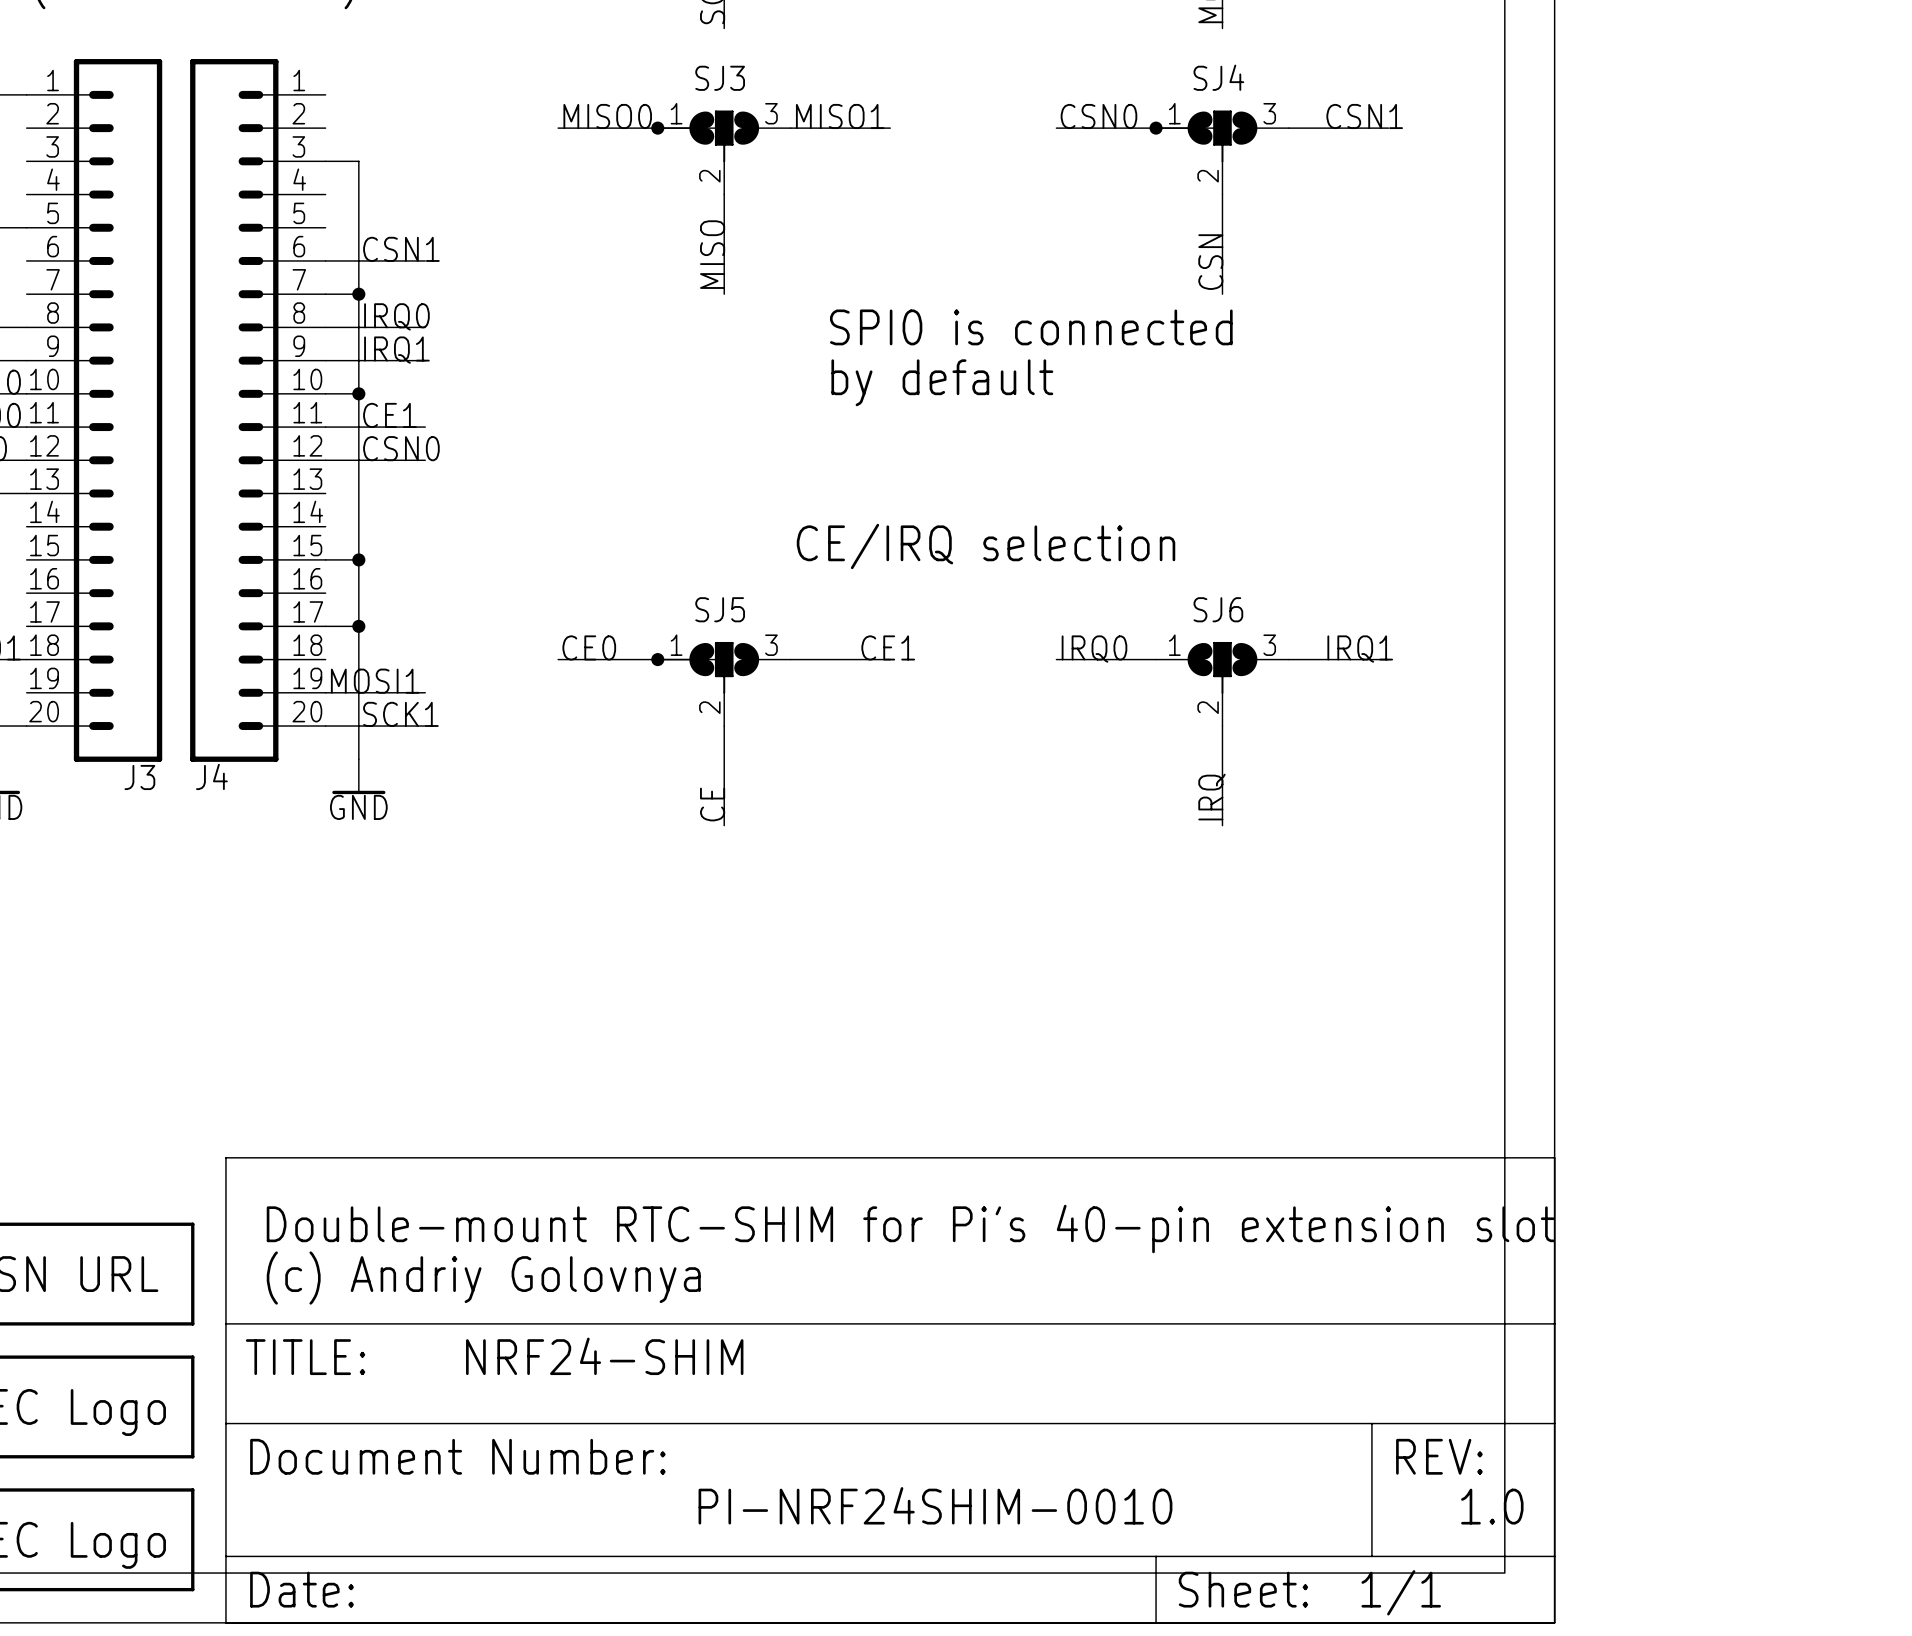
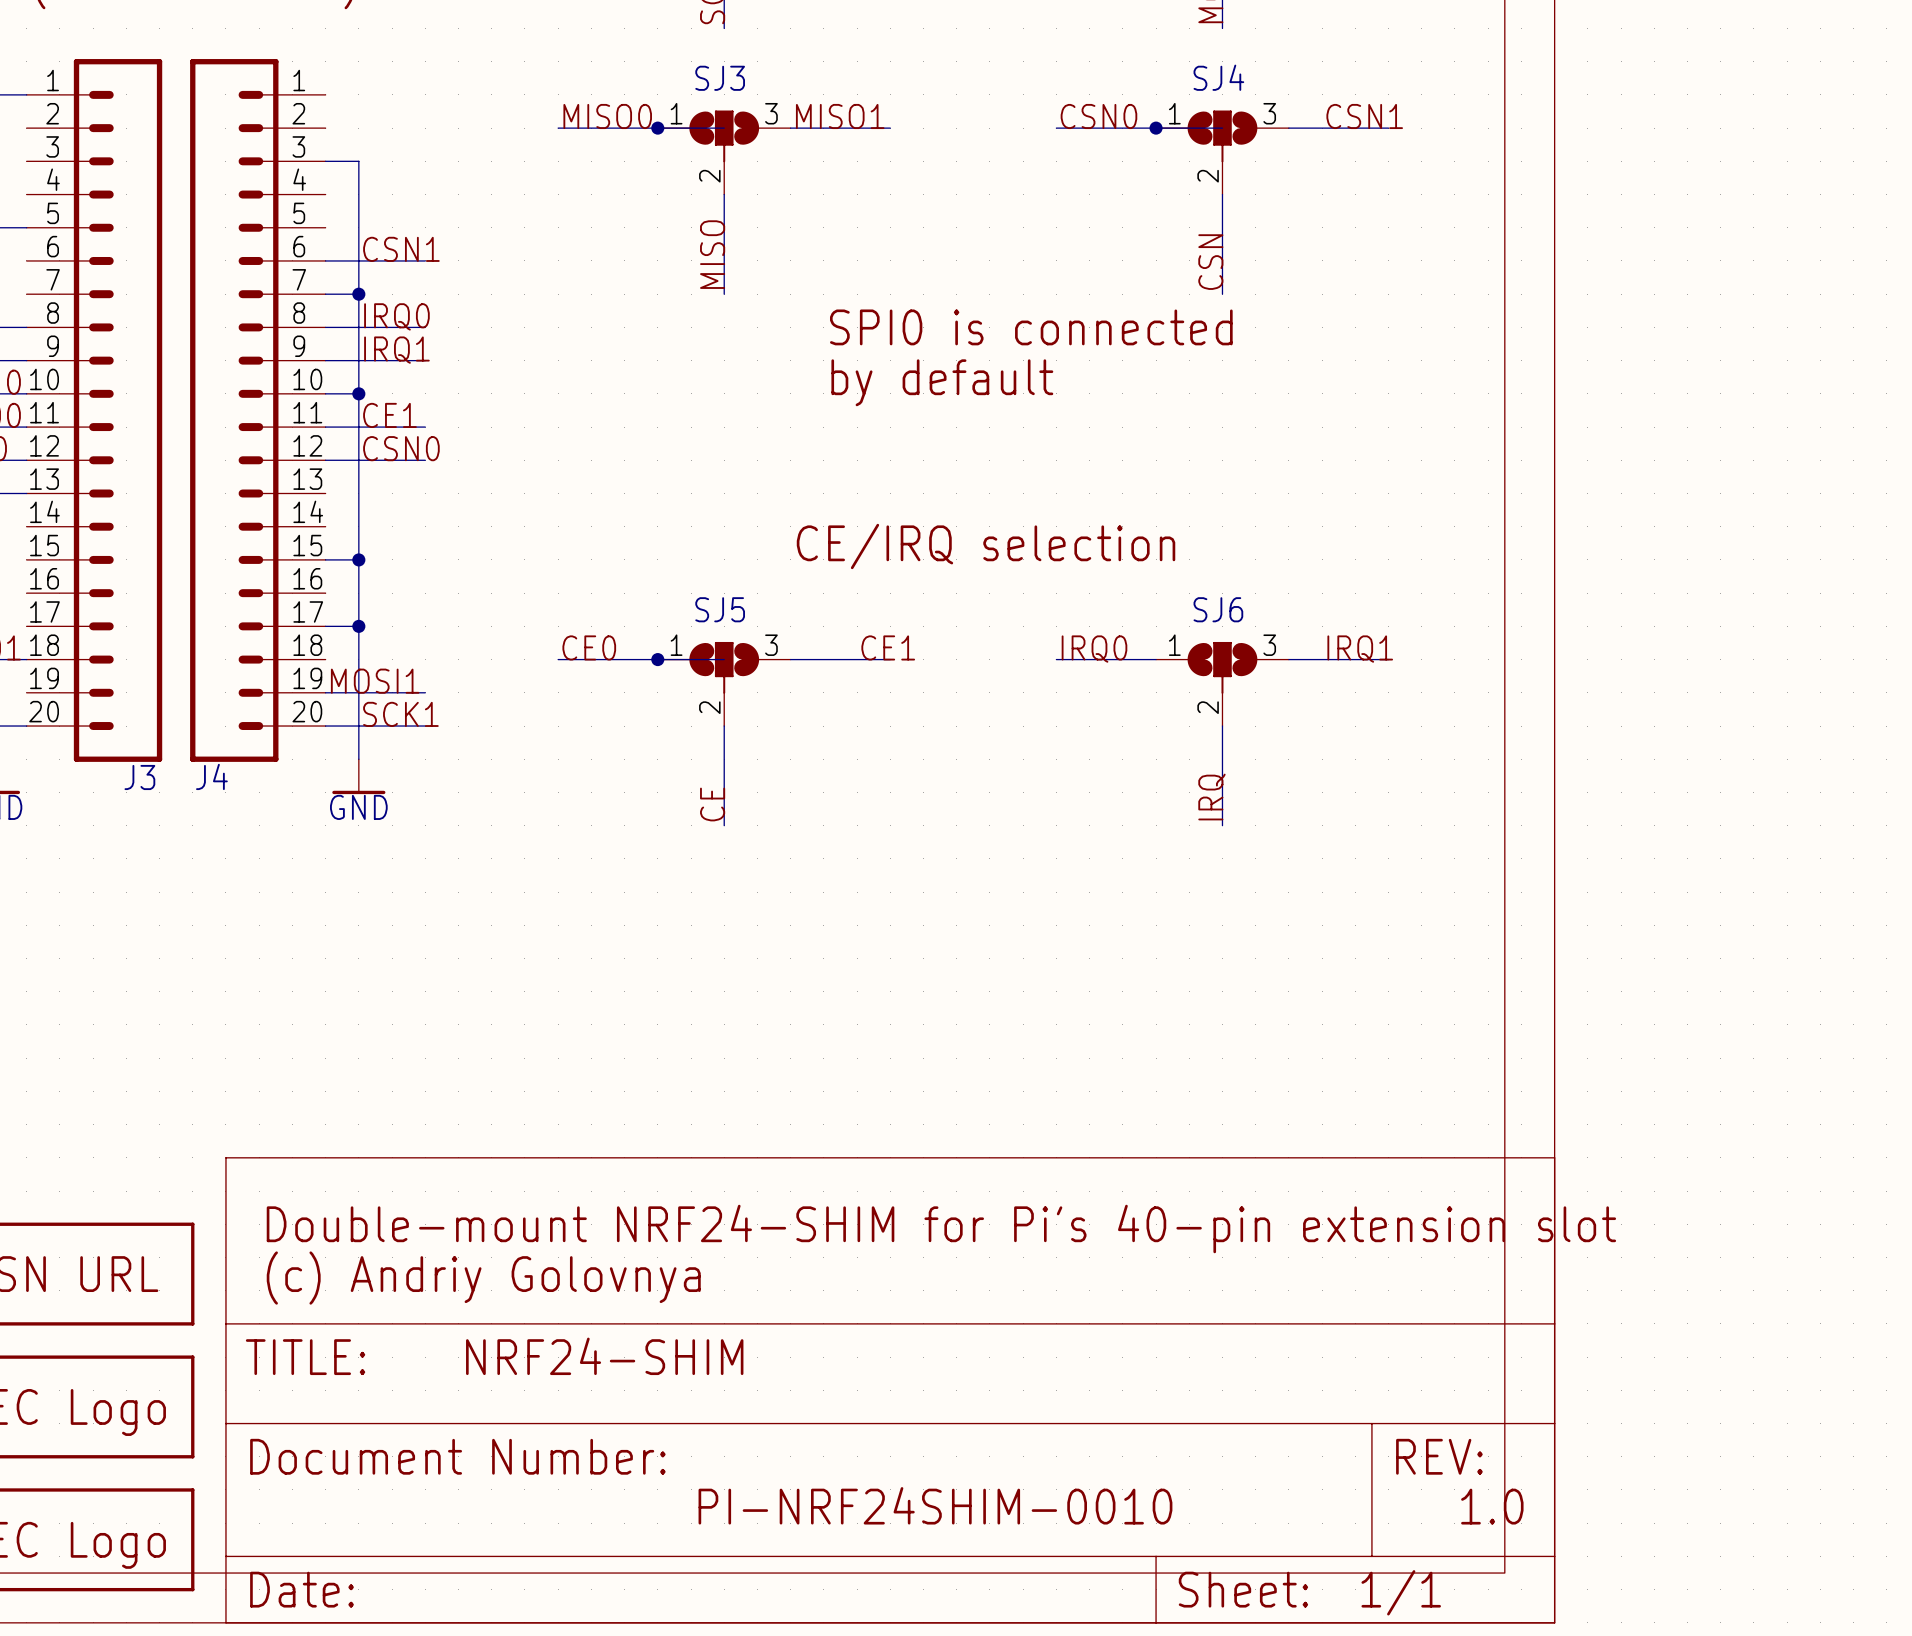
text: Double-mount RTC-SHIM for Pi's 40-pin extension slot (910, 1229) -> Double-mount NRF24-SHIM for Pi's 40-pin extension slot (941, 1229)

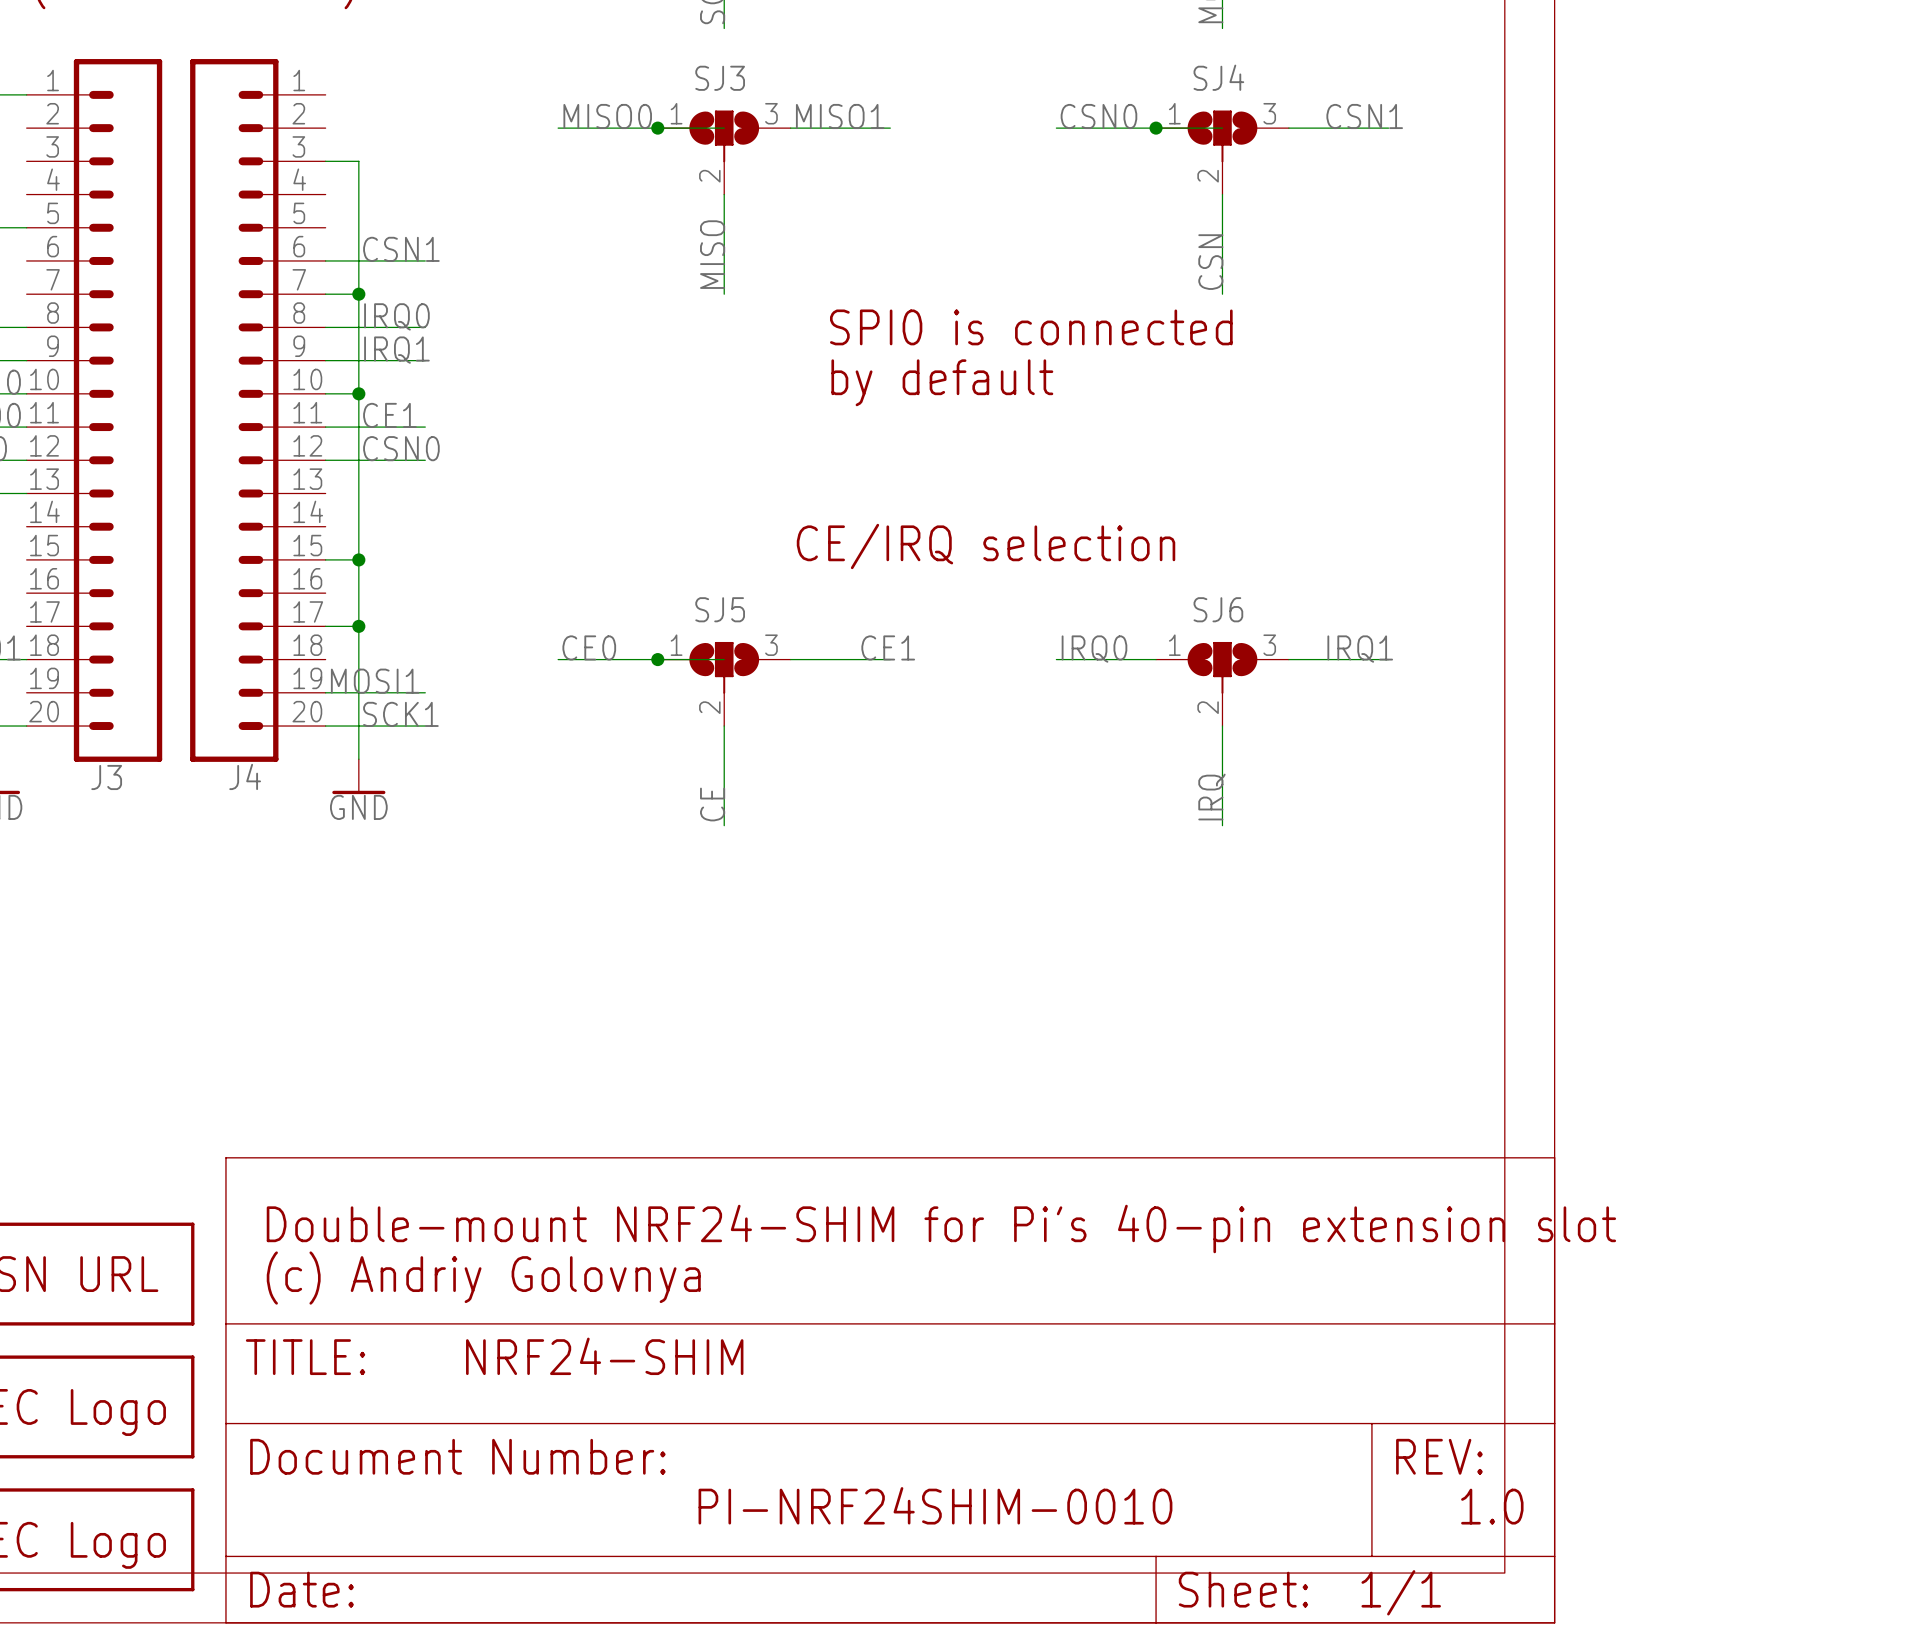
J4 name position: J4 (211, 776) -> J4 (245, 776)
J3 name position: J3 (139, 777) -> J3 (106, 777)

